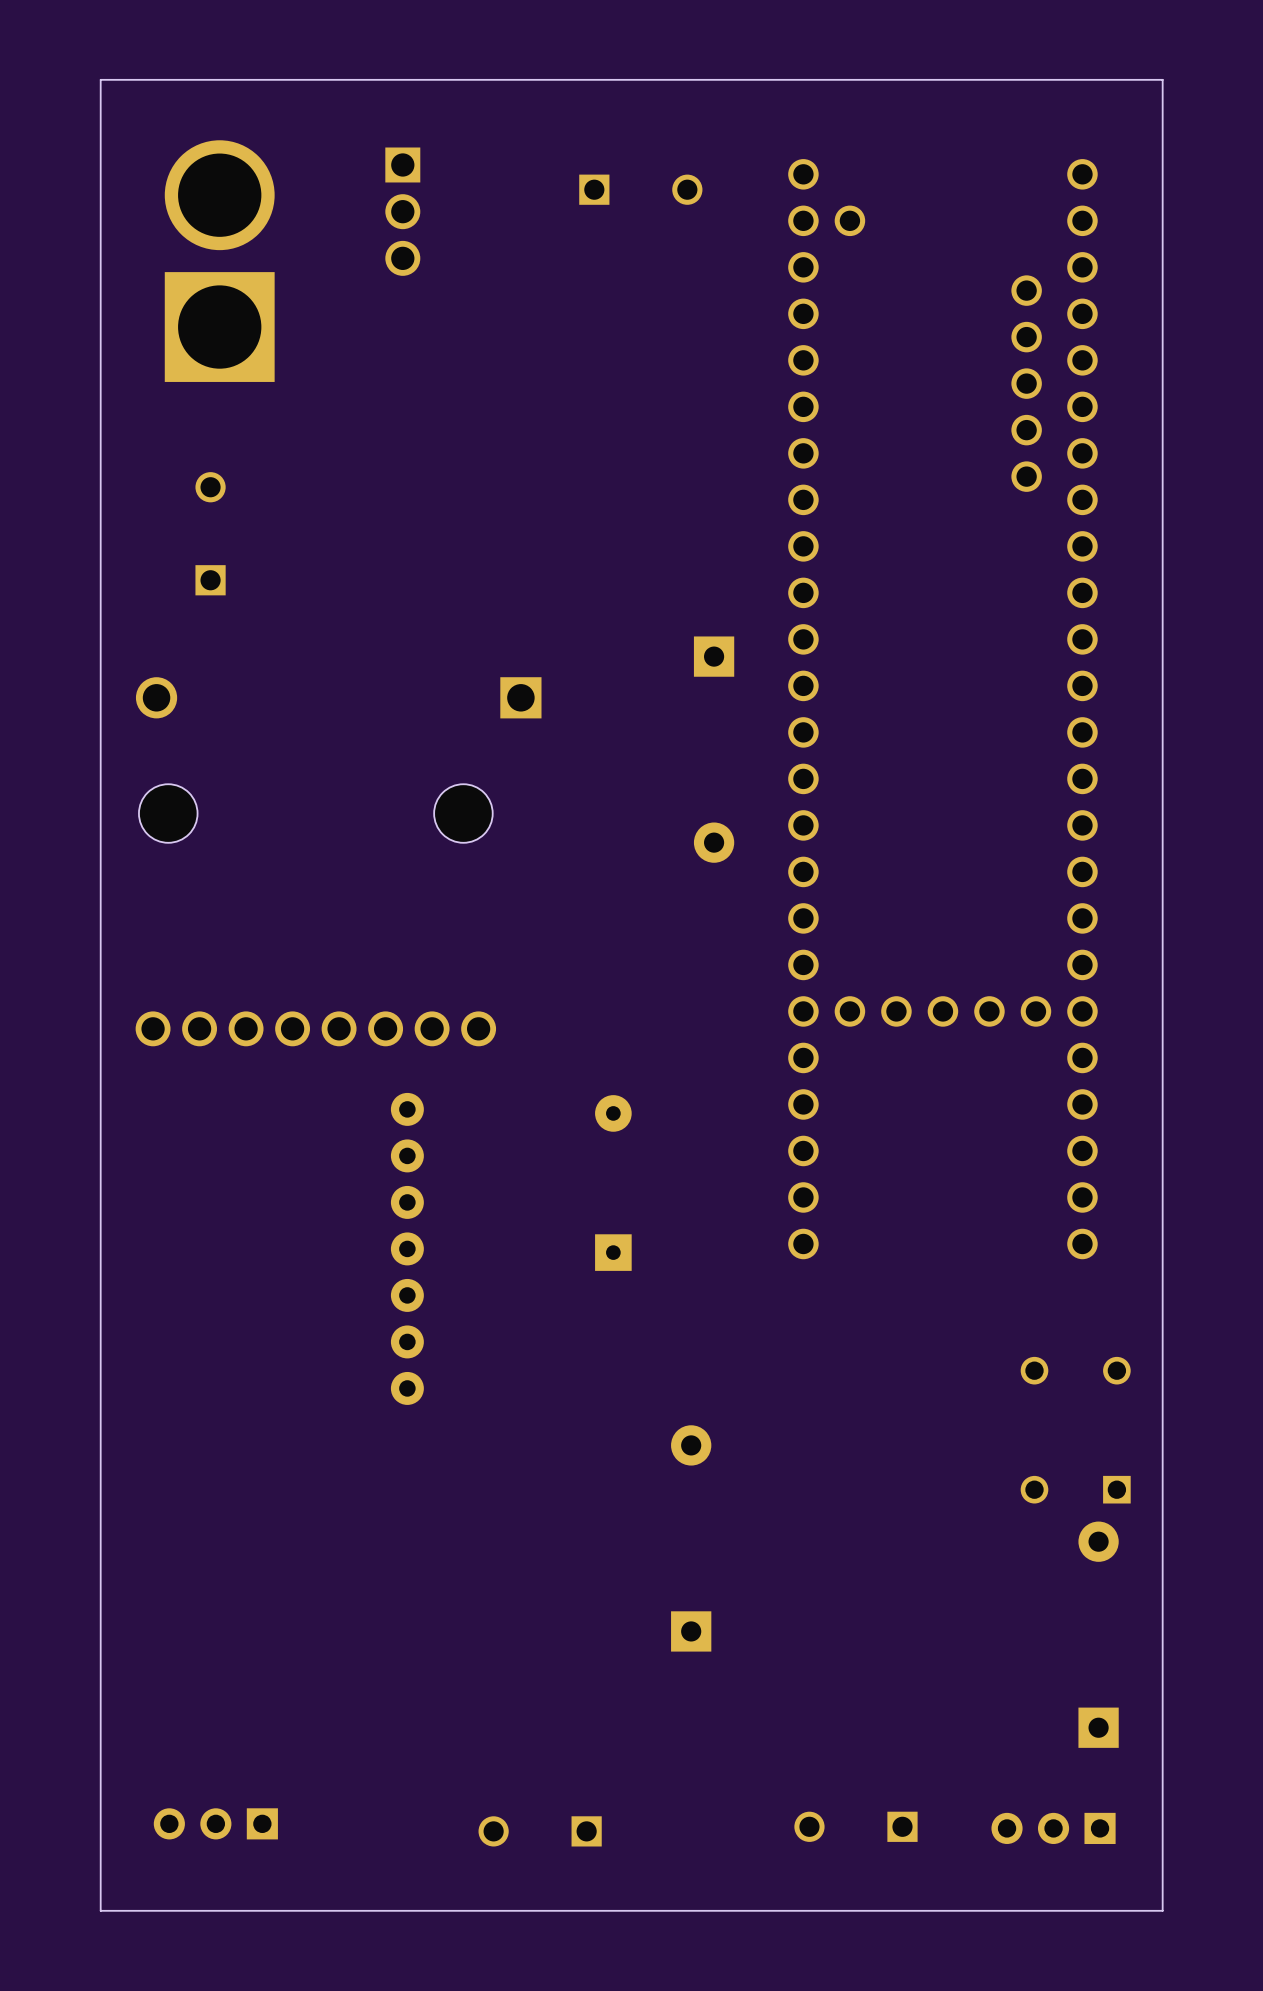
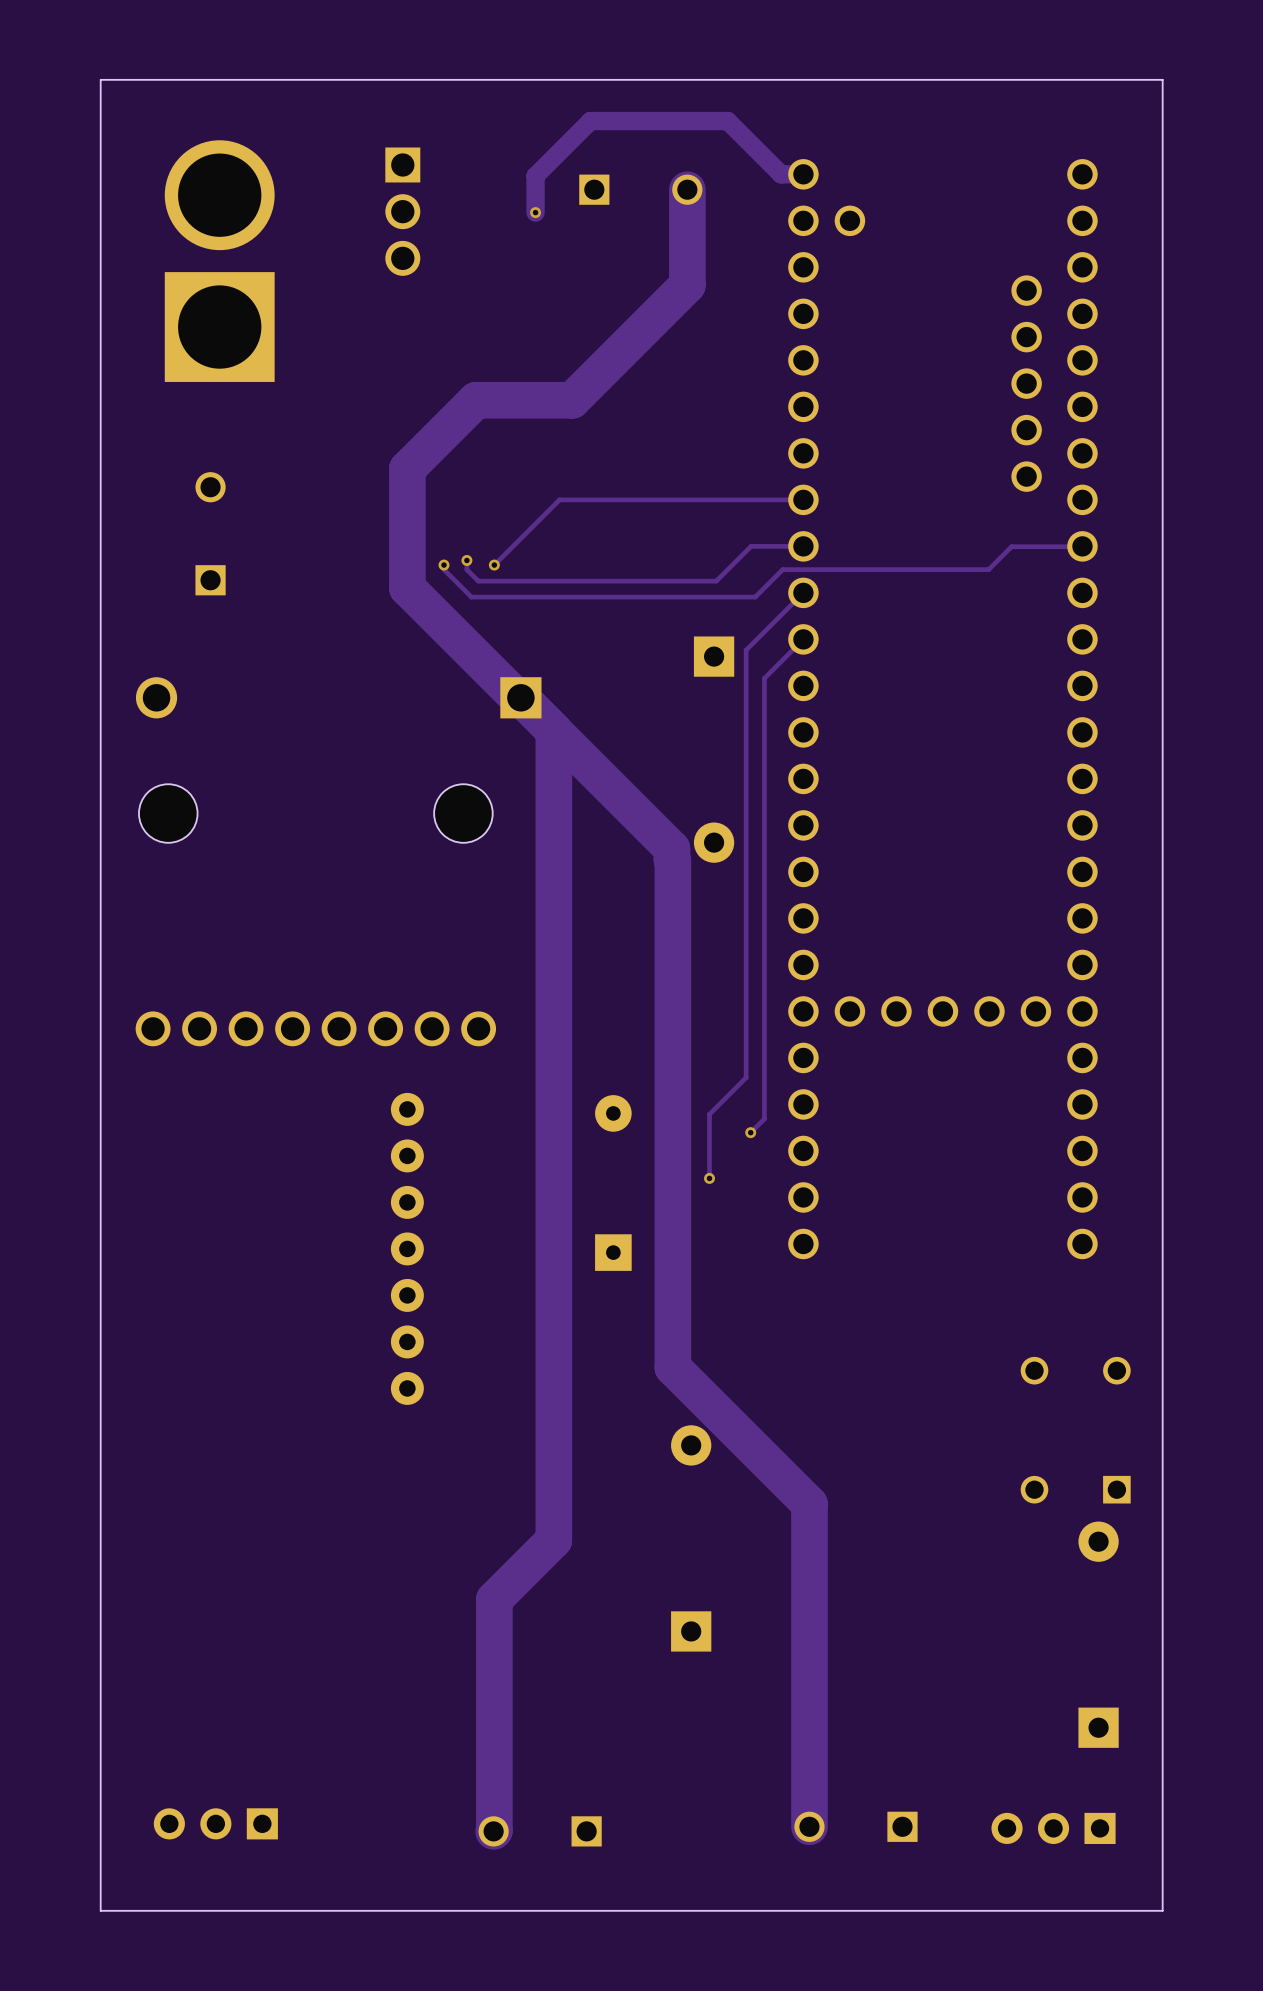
track: none -> (803, 174) (781, 174) (727, 121) (590, 121) (535, 175) (535, 212)
track: none -> (687, 189) (687, 285) (572, 400) (476, 400) (407, 468) (407, 587) (671, 848) (672, 1367) (809, 1504) (809, 1826)
via: none -> (535, 212)
track: none -> (803, 499) (559, 499) (494, 565)
track: none -> (803, 546) (751, 546) (716, 581) (478, 581) (466, 569) (466, 560)
track: none -> (1082, 546) (1011, 546) (988, 569) (782, 569) (755, 597) (471, 597) (444, 569) (444, 565)
via: none -> (466, 560)
via: none -> (444, 565)
via: none -> (494, 565)
track: none -> (803, 592) (746, 650) (746, 1077) (709, 1114) (709, 1178)
track: none -> (803, 639) (764, 678) (764, 1118) (750, 1132)
track: none -> (553, 730) (553, 1540) (494, 1599) (493, 1831)
via: none -> (750, 1132)
via: none -> (709, 1178)

